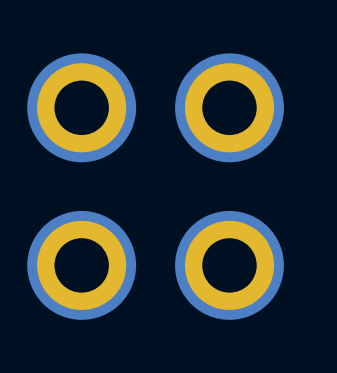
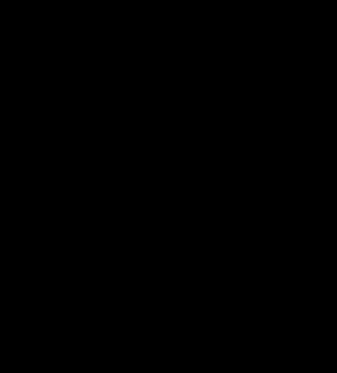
part: (81, 107) -> none
part: (229, 107) -> none
part: (81, 265) -> none
part: (229, 265) -> none

